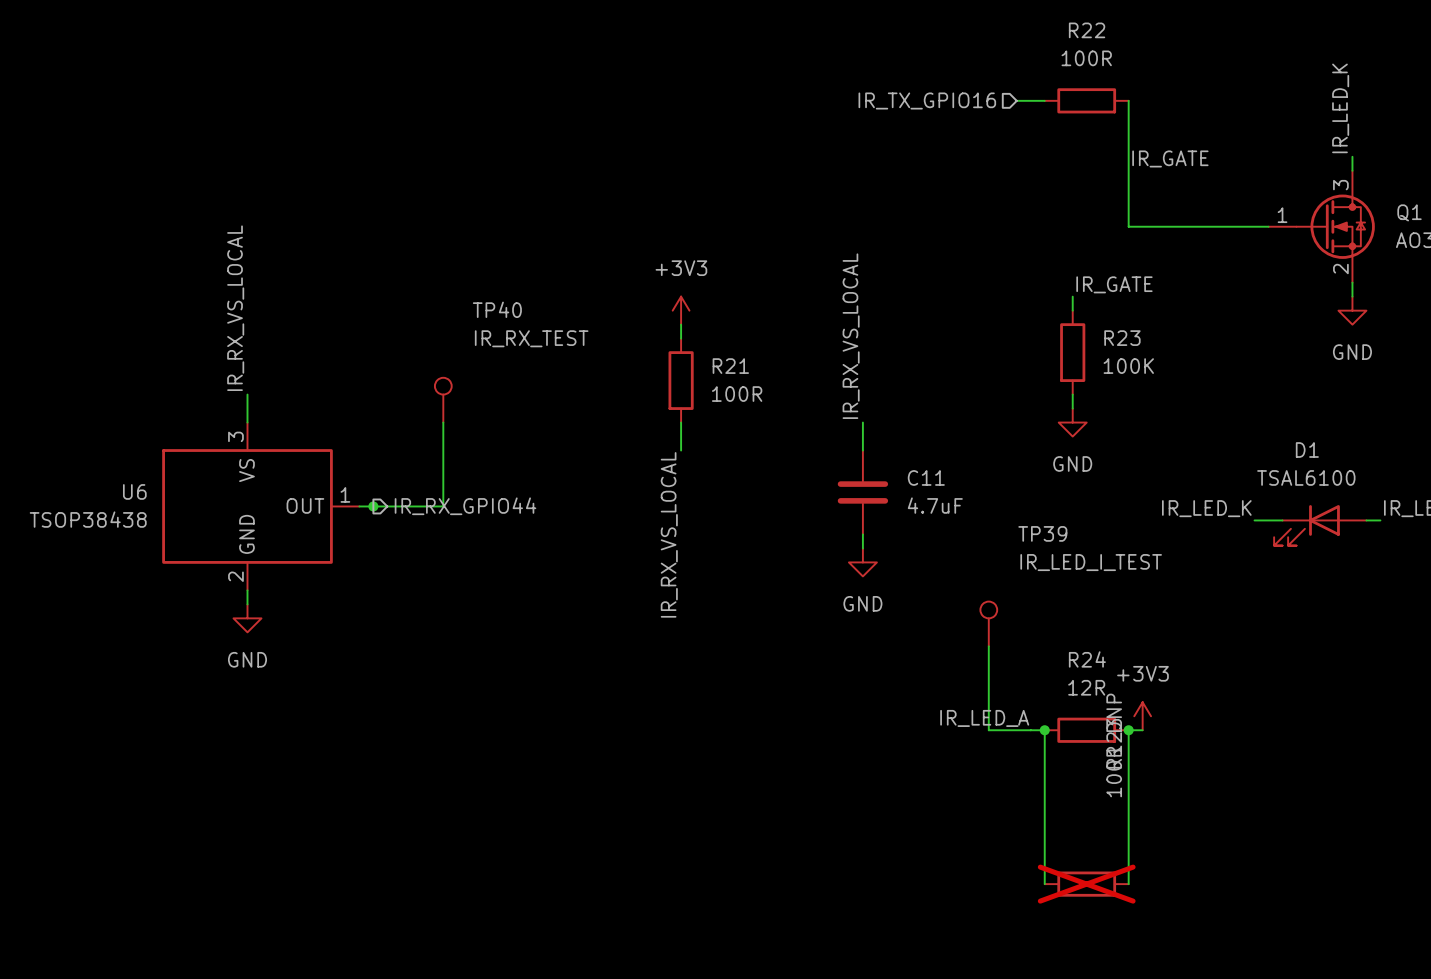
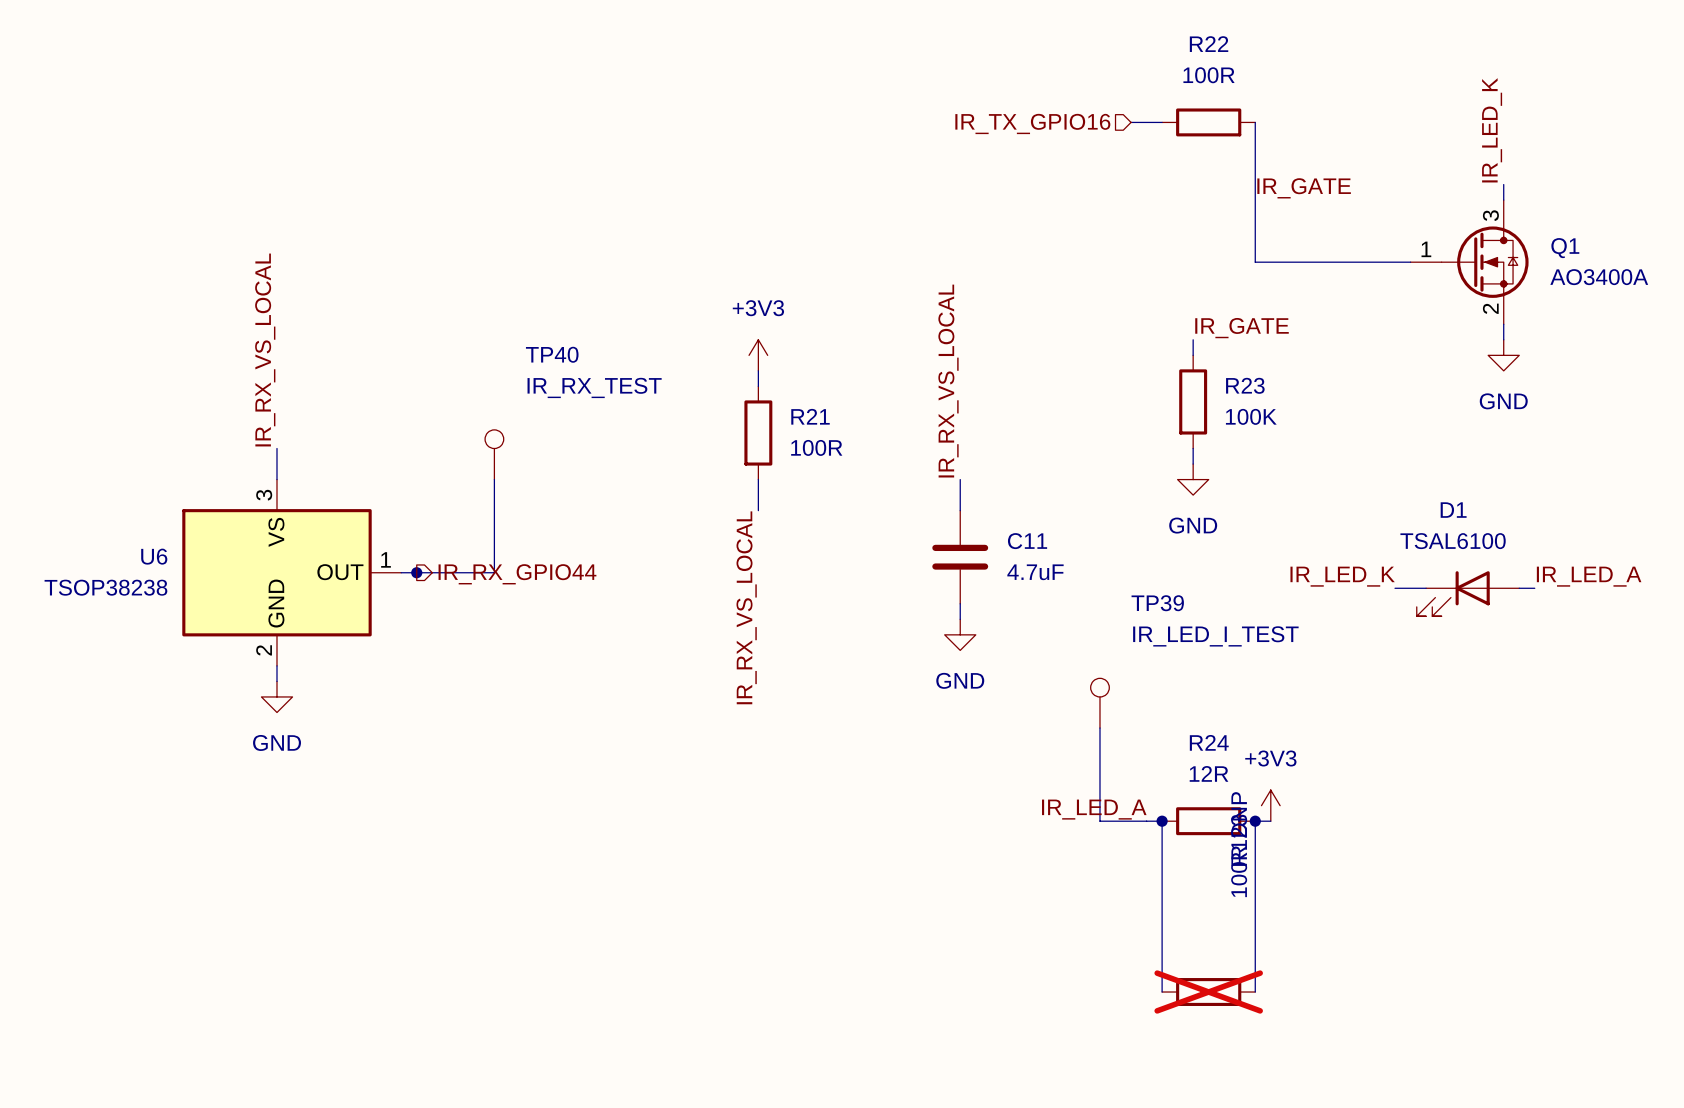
U6 value: TSOP38438 (88, 519) -> TSOP38238 (105, 587)

